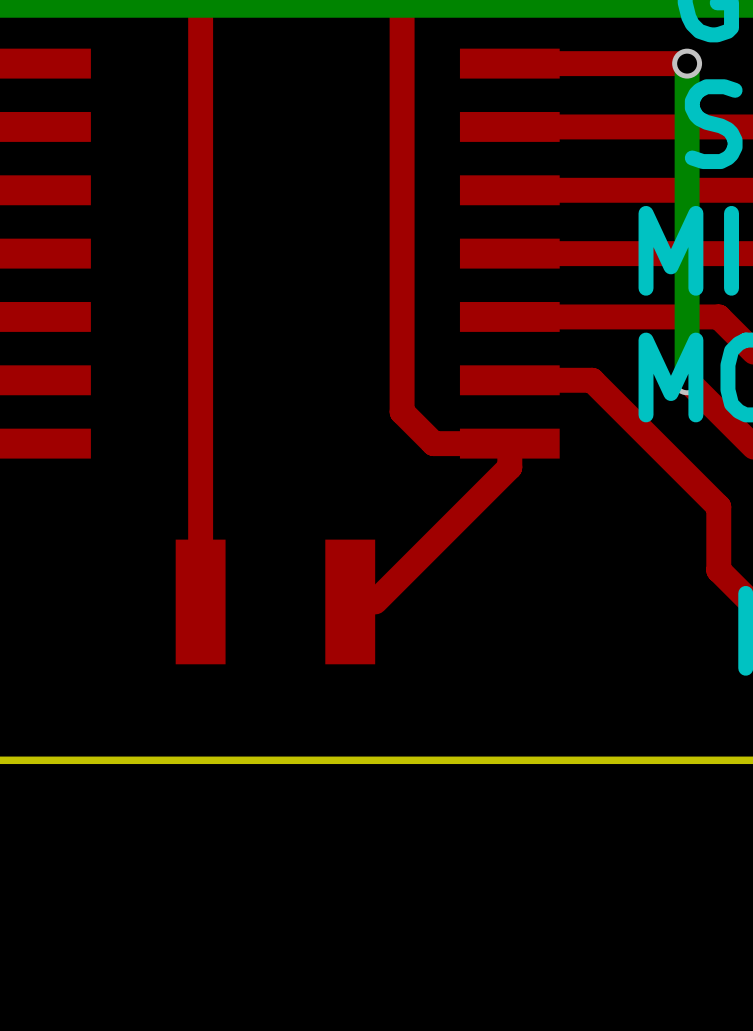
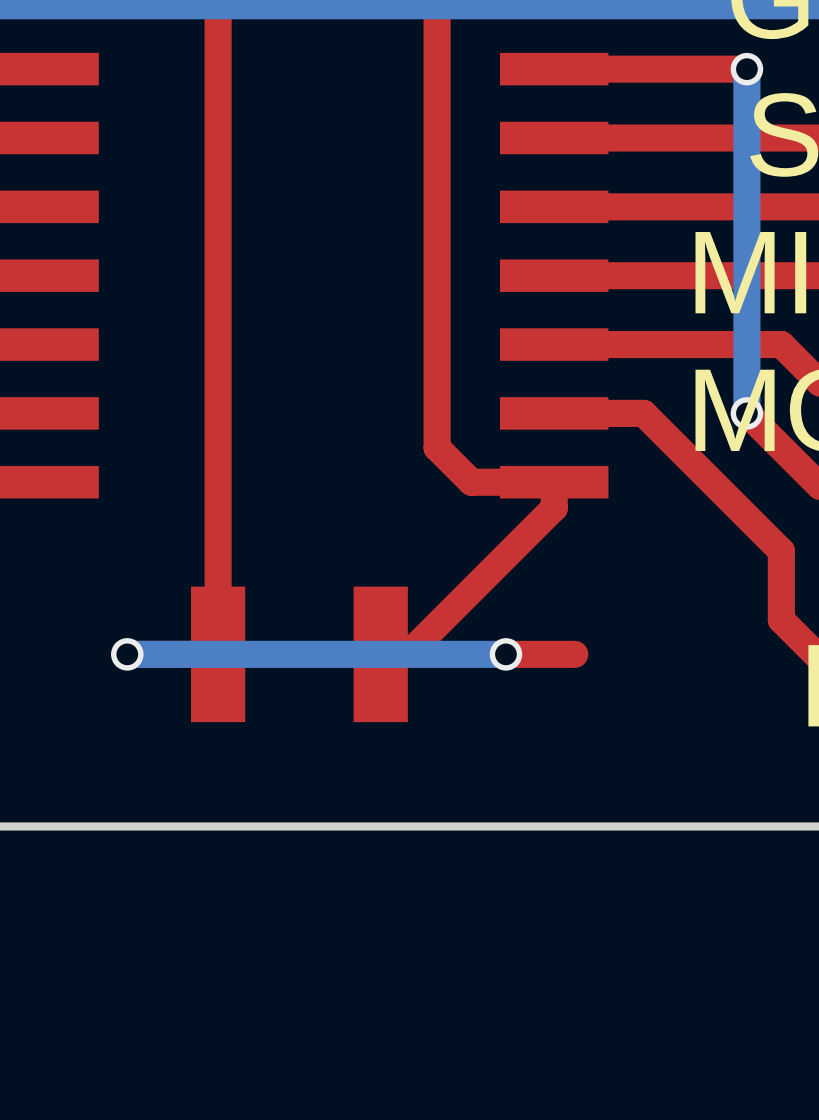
via: none -> (127, 654)
bottom track: none -> (505, 654) (127, 654)
via: none -> (505, 654)
top track: none -> (574, 654) (505, 654)

